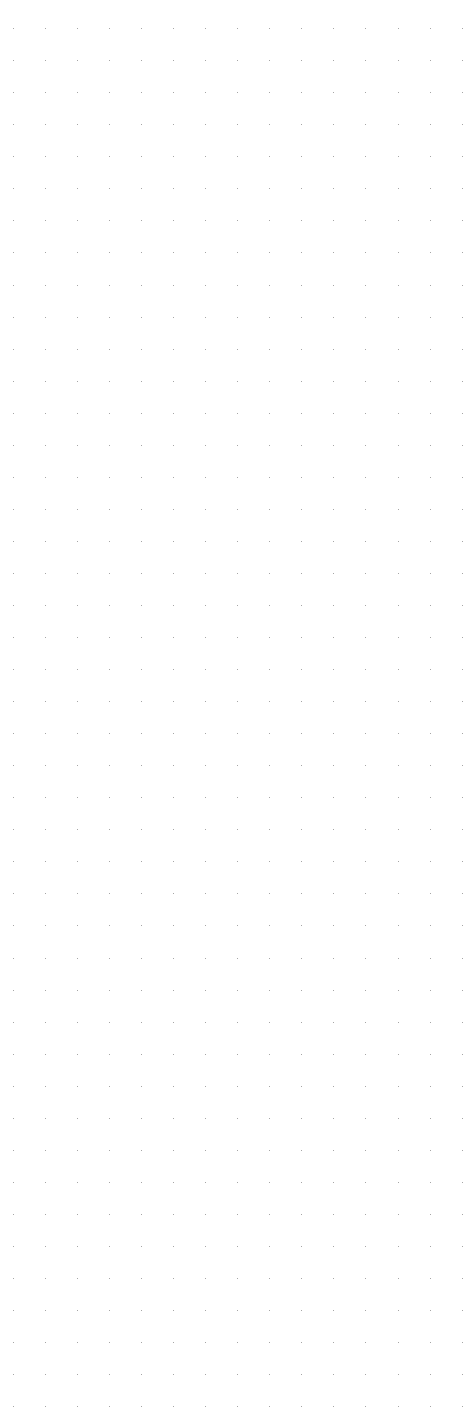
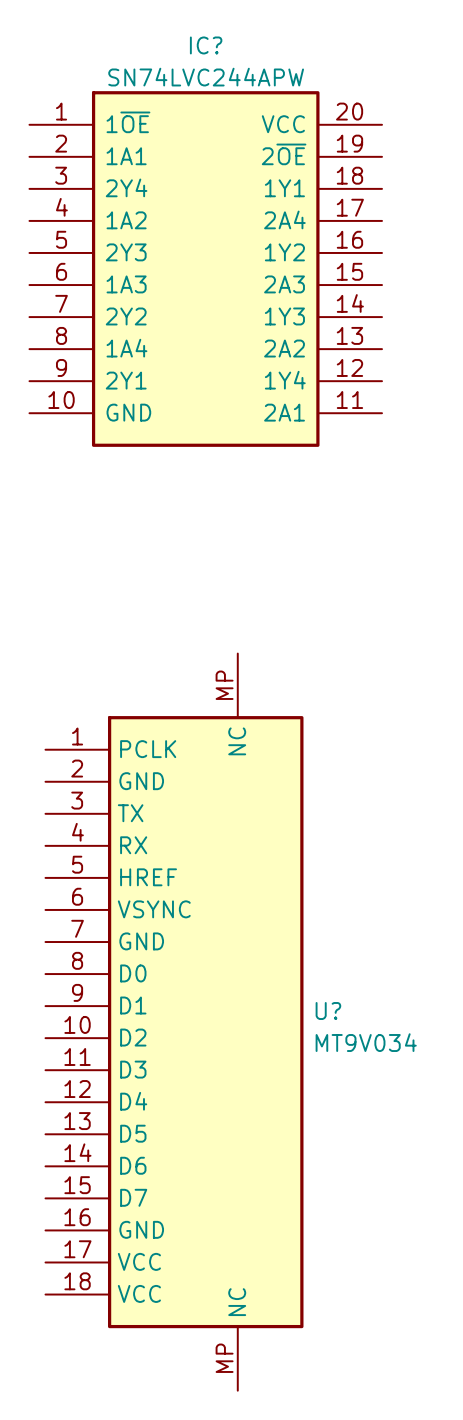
IC?: none -> SN74LVC244APW (205, 269)
U?: none -> MT9V034 (174, 1022)

